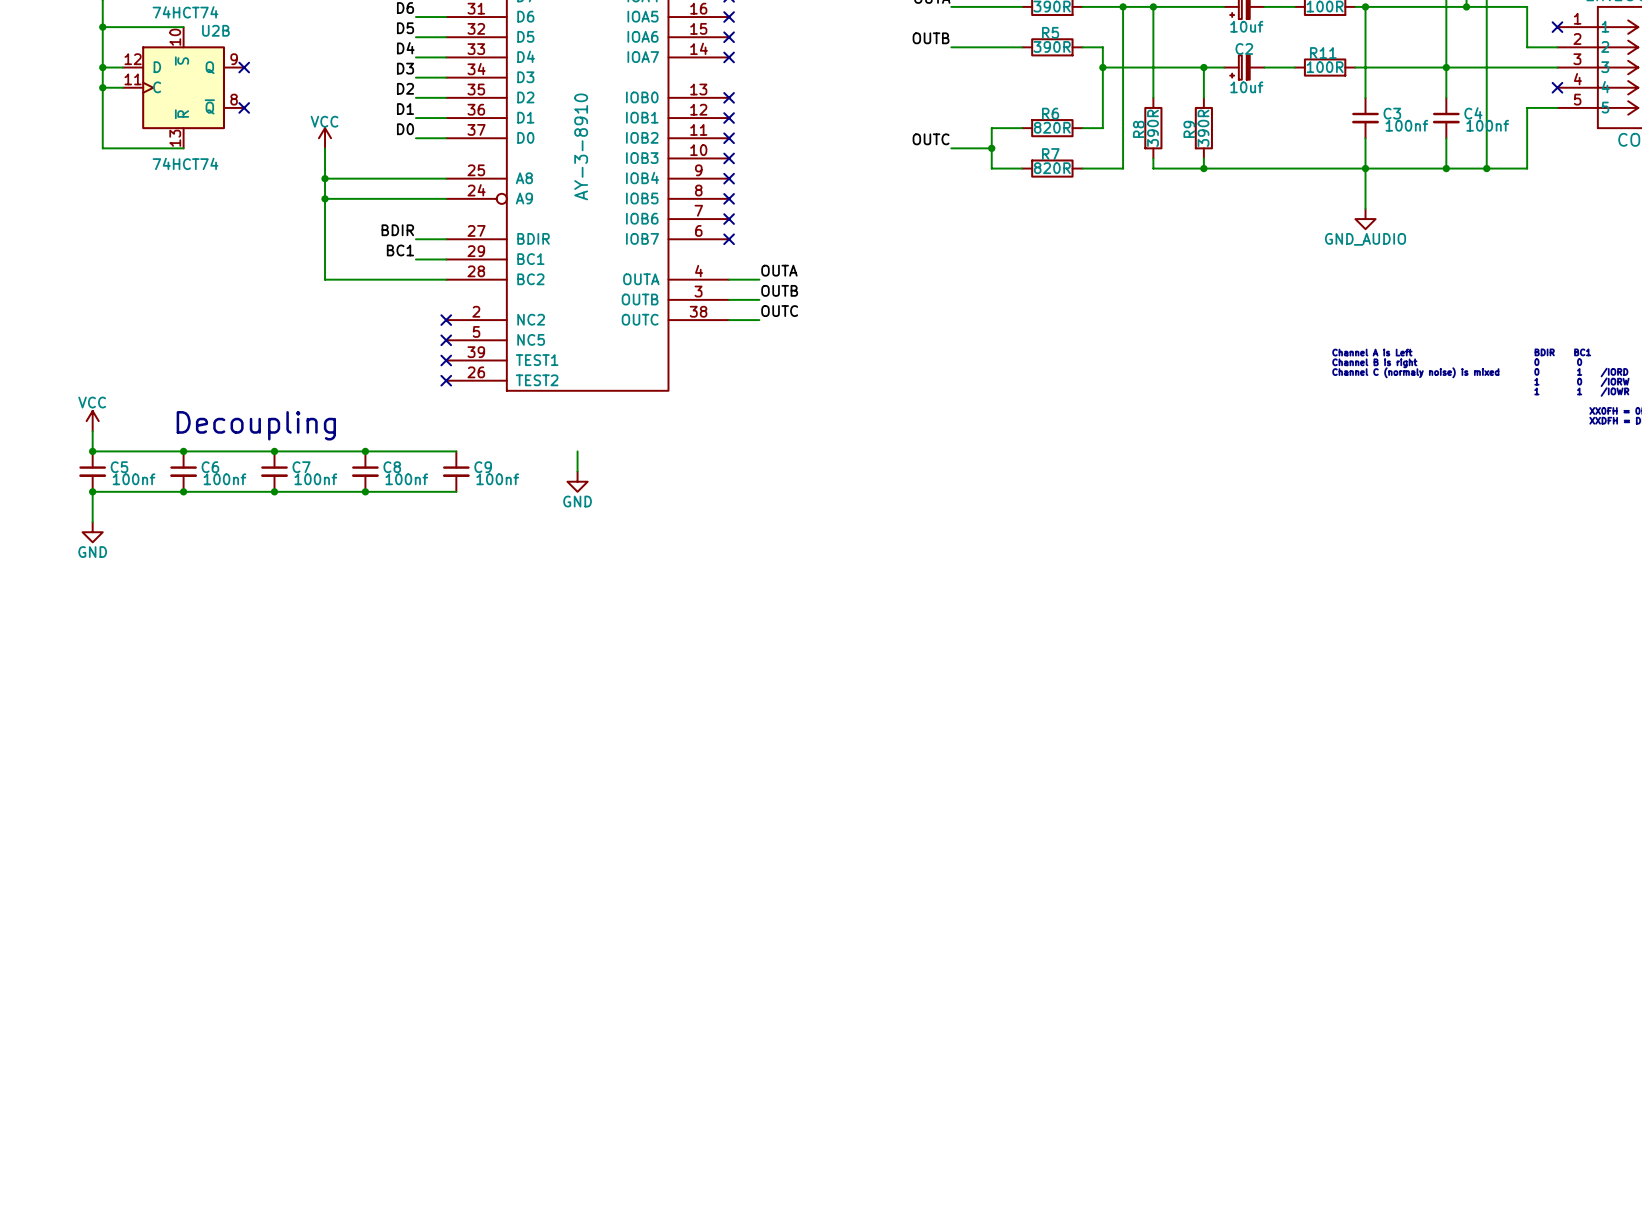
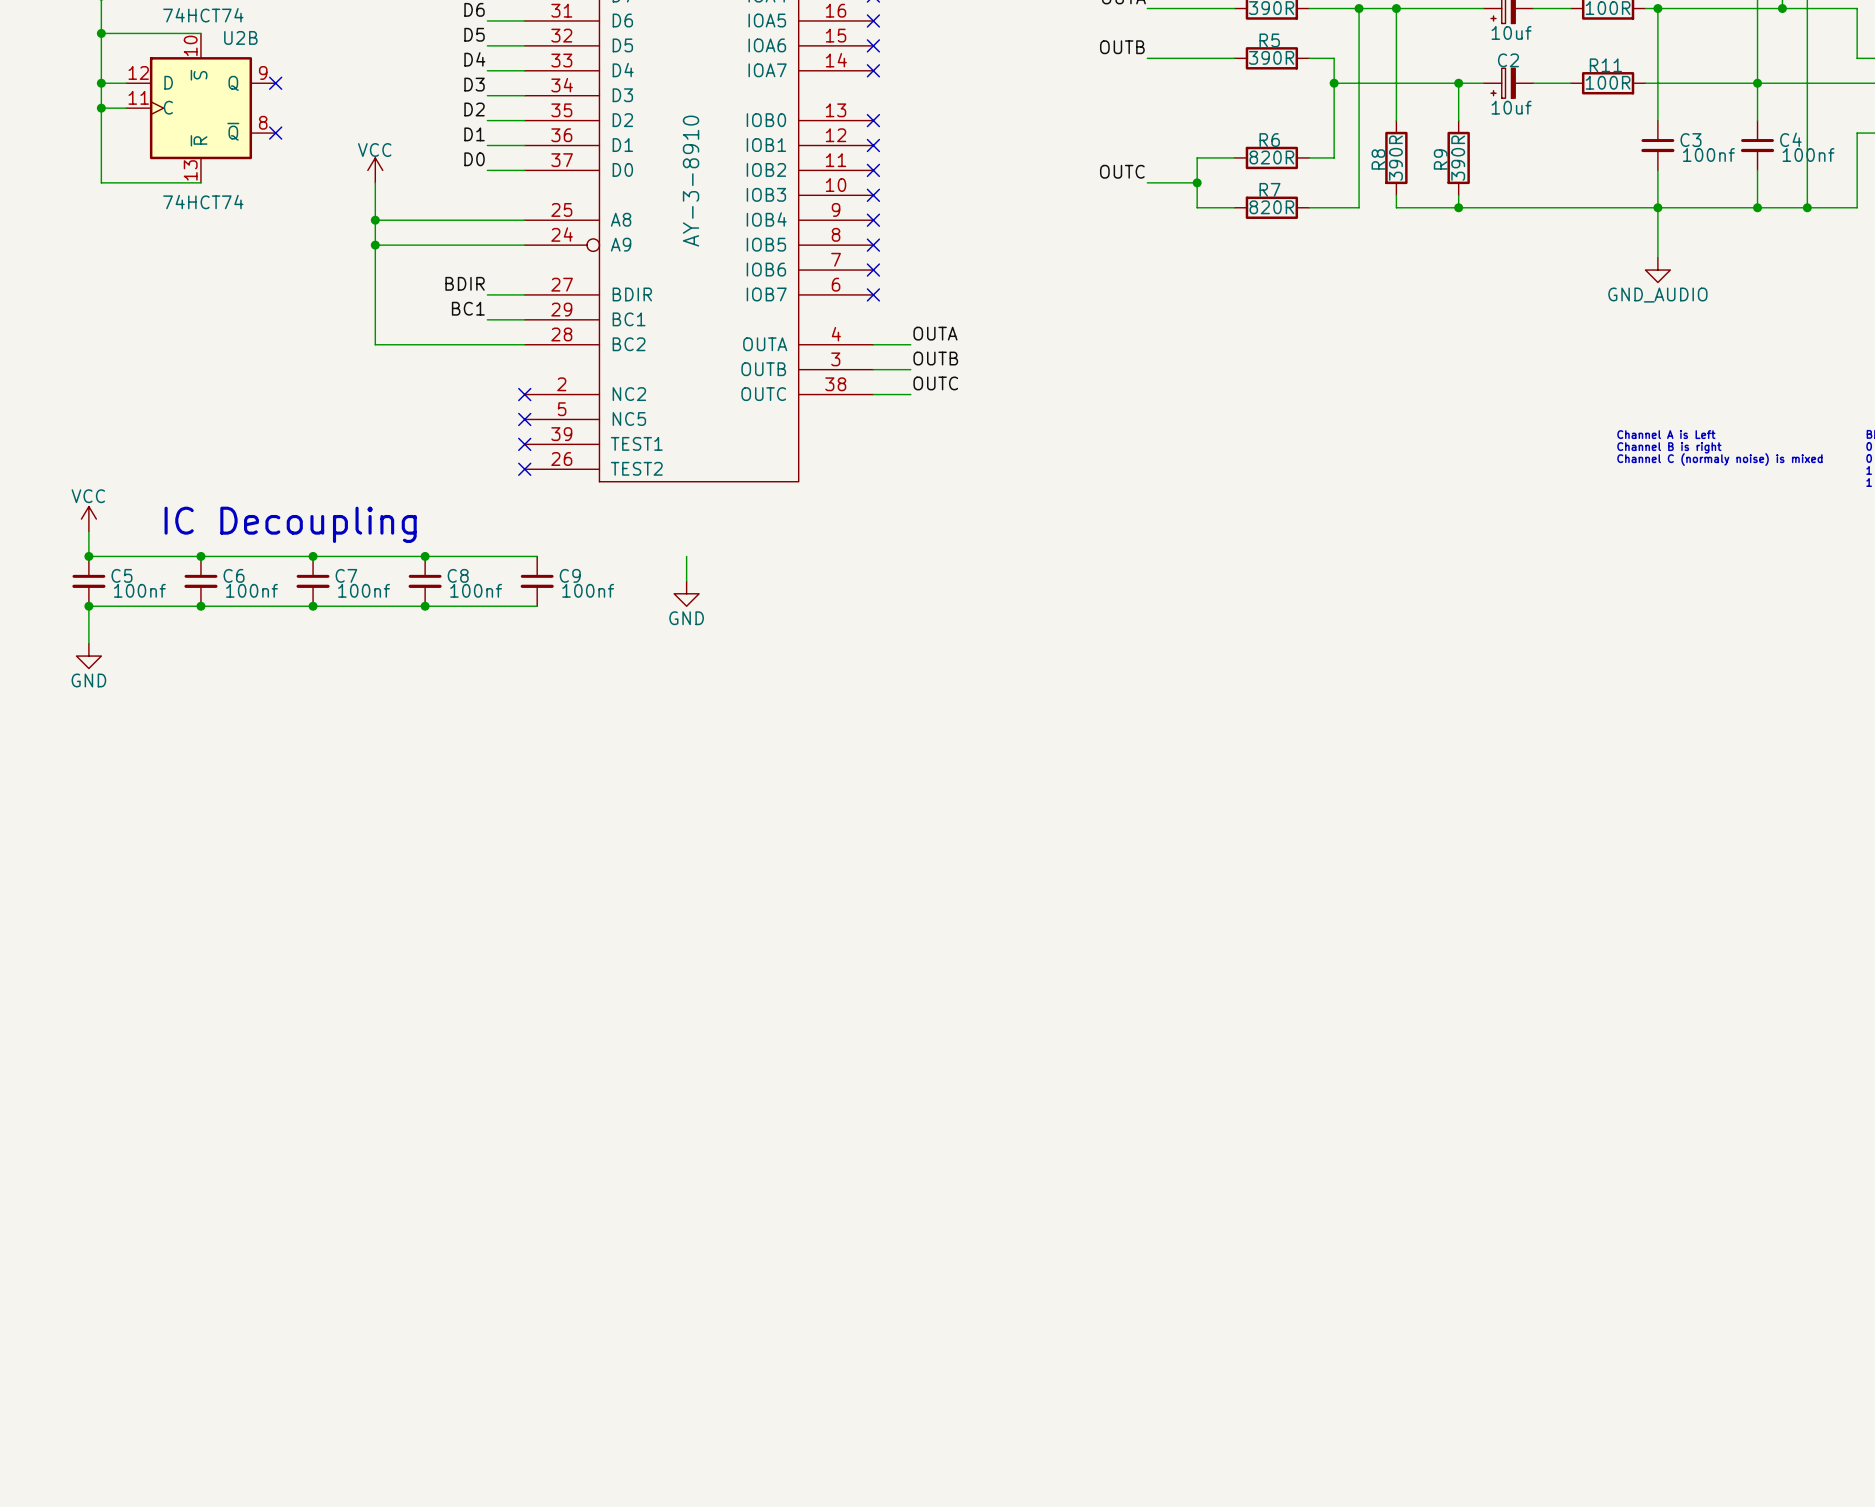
text: Decoupling (256, 425) -> IC Decoupling (290, 524)

